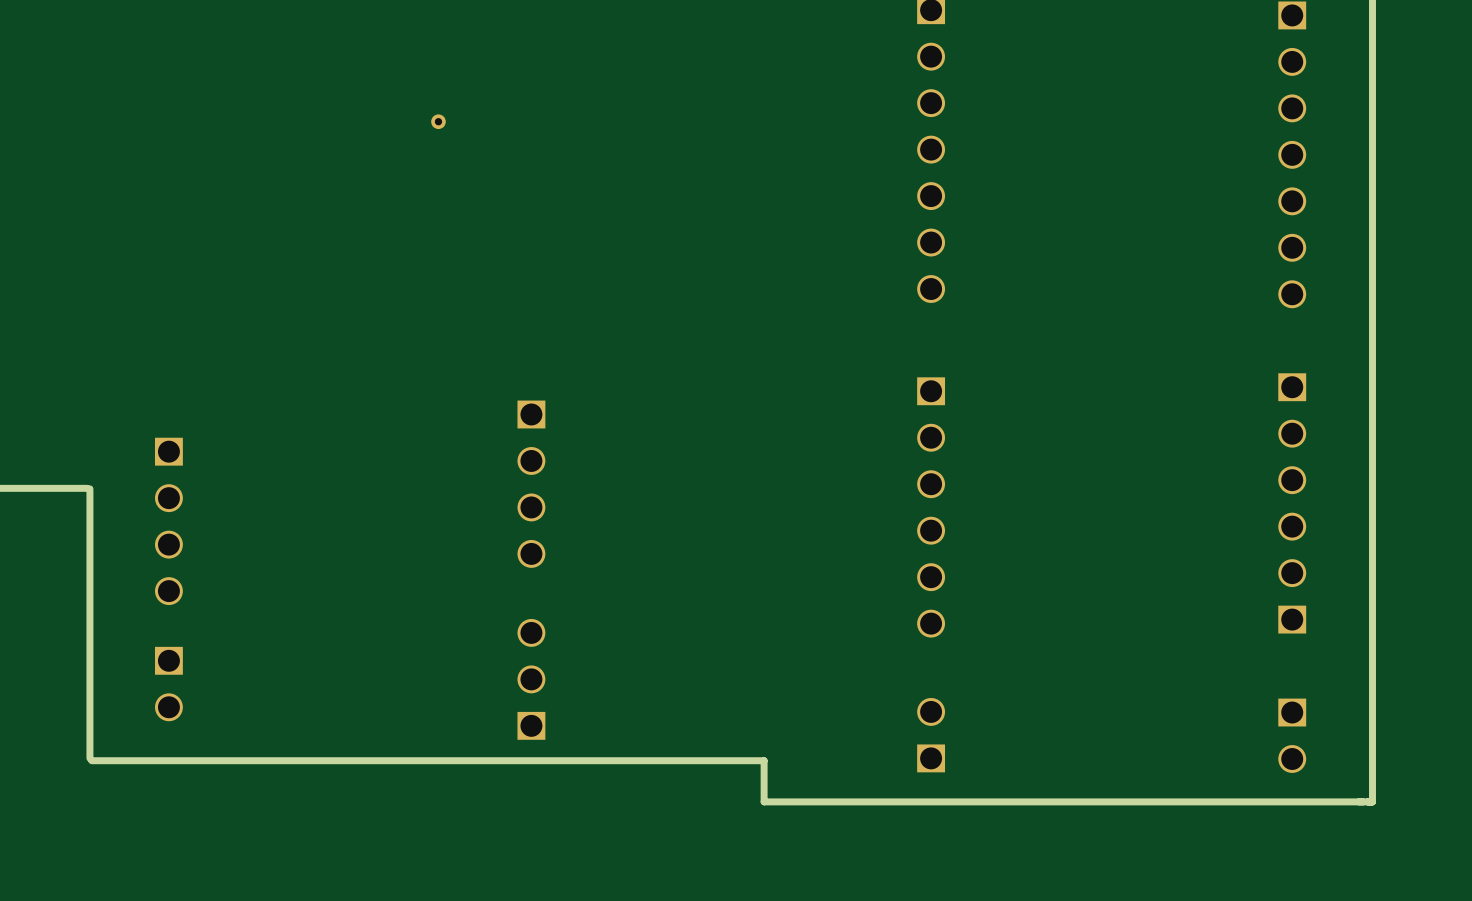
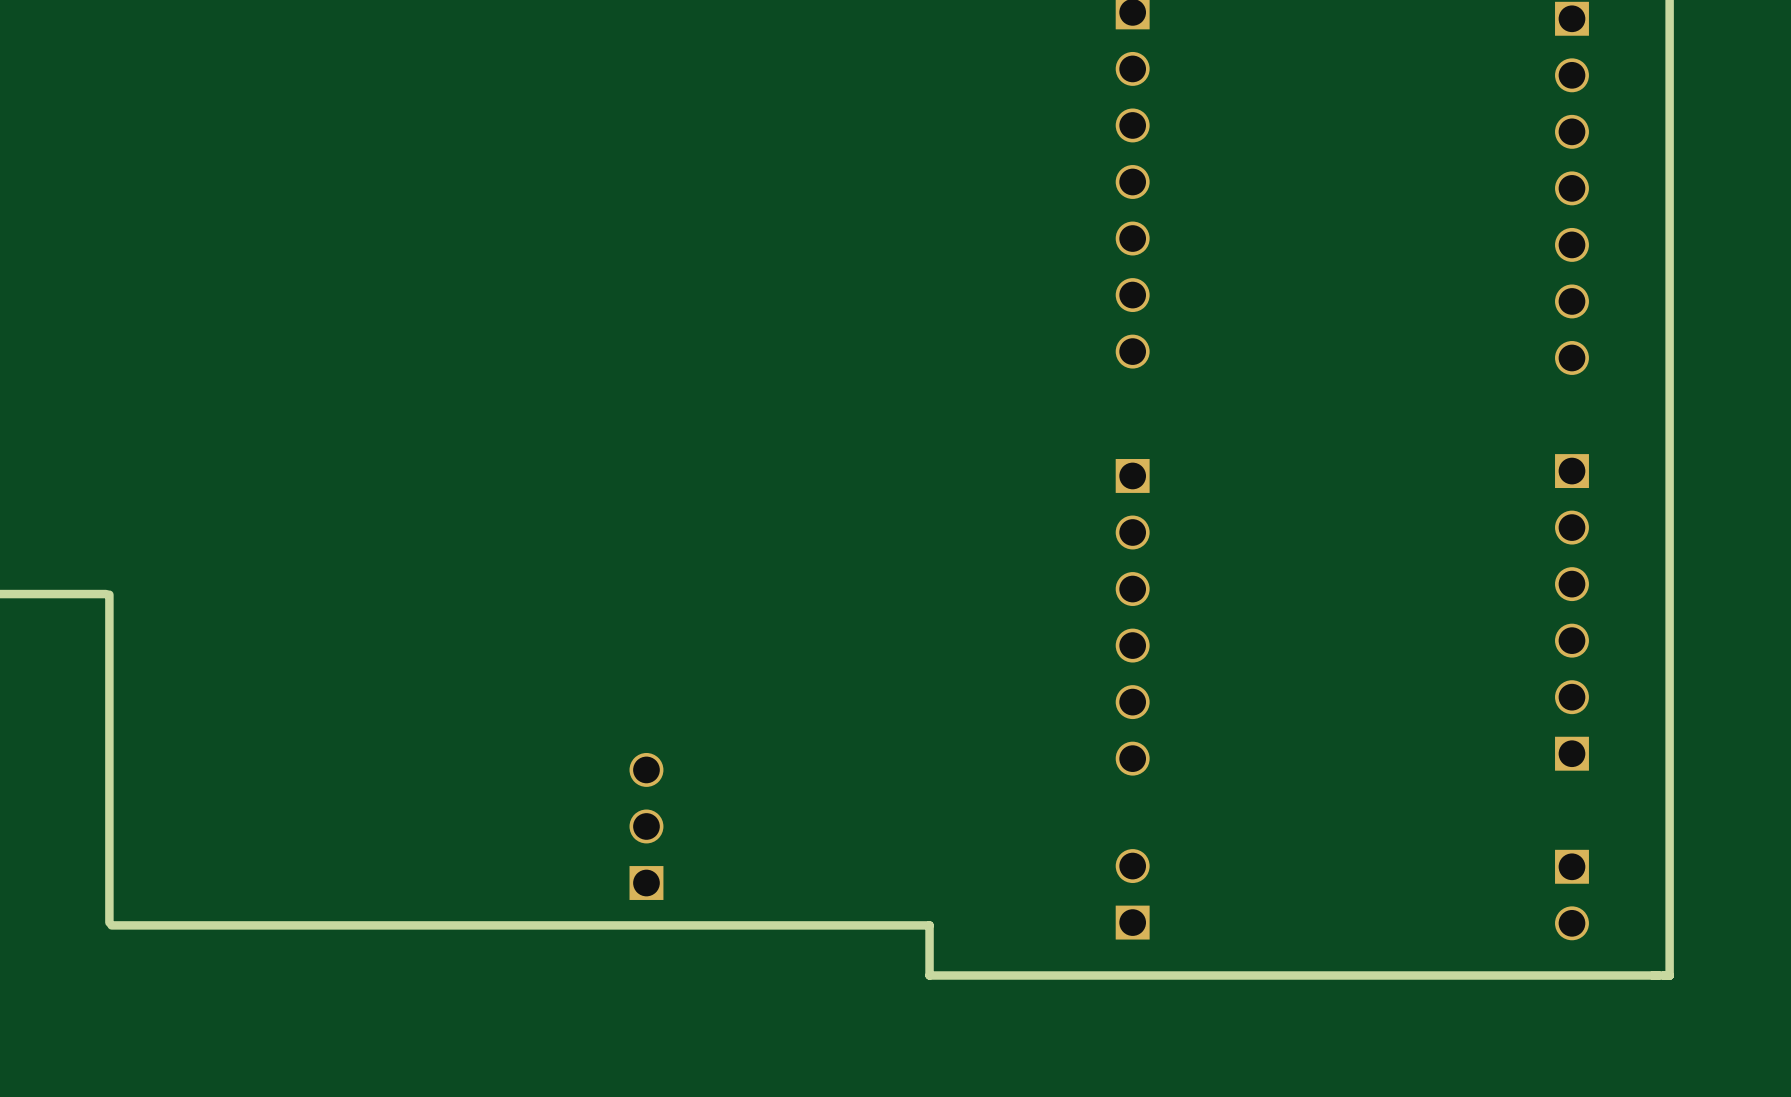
part: (438, 121) -> none
part: (531, 484) -> none
part: (168, 521) -> none
part: (168, 684) -> none

